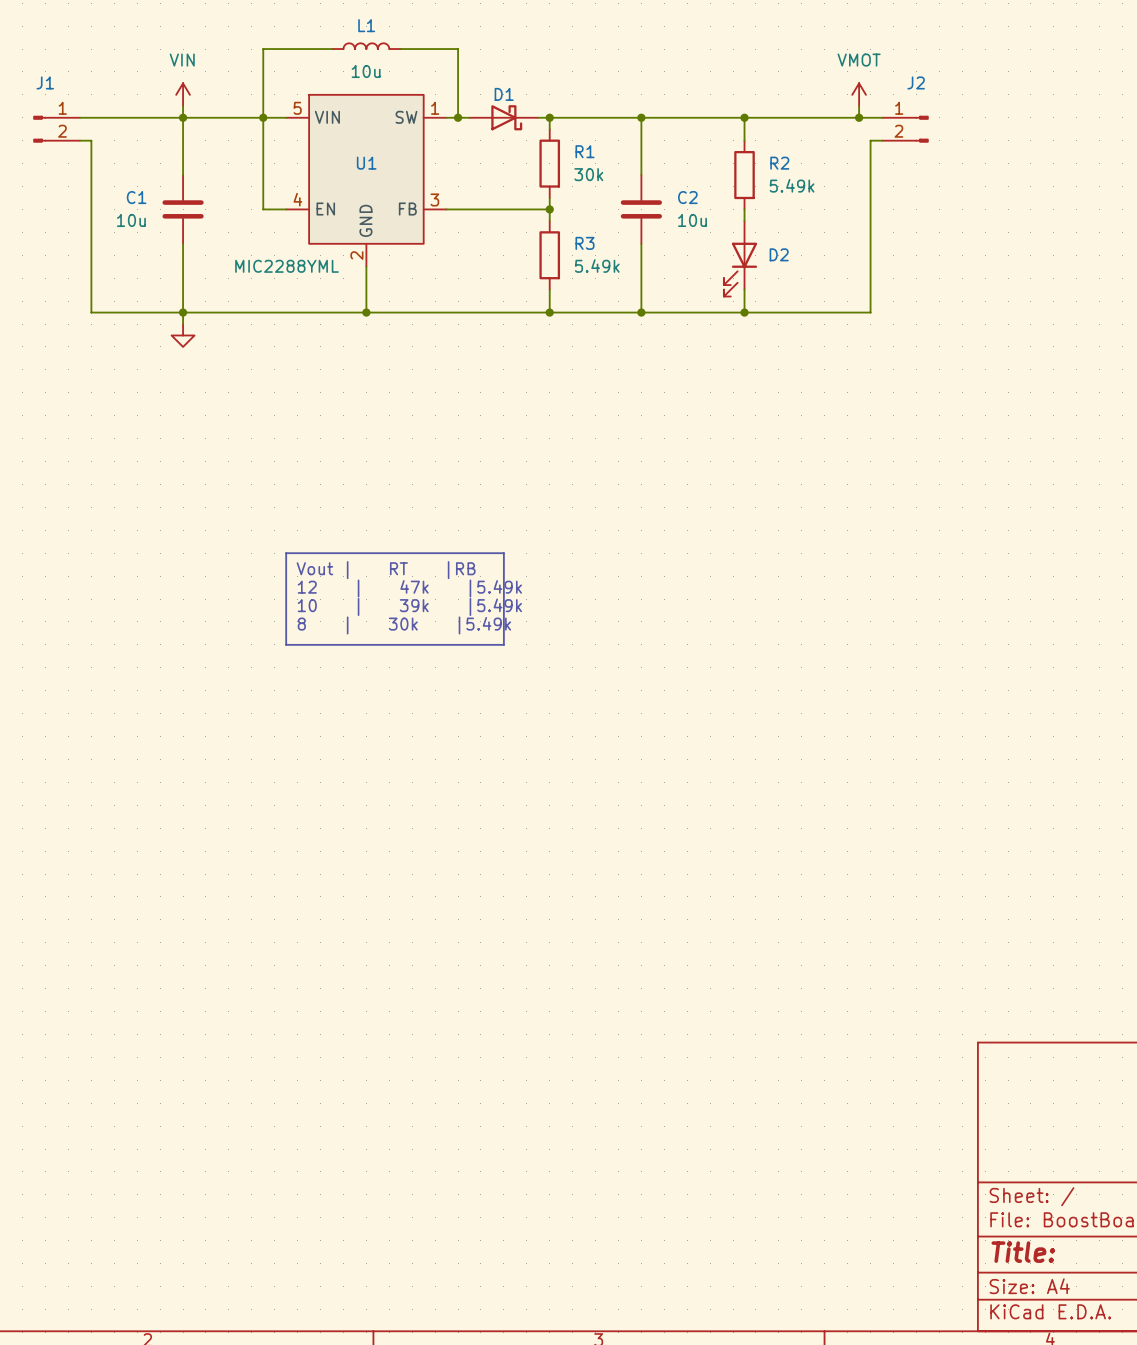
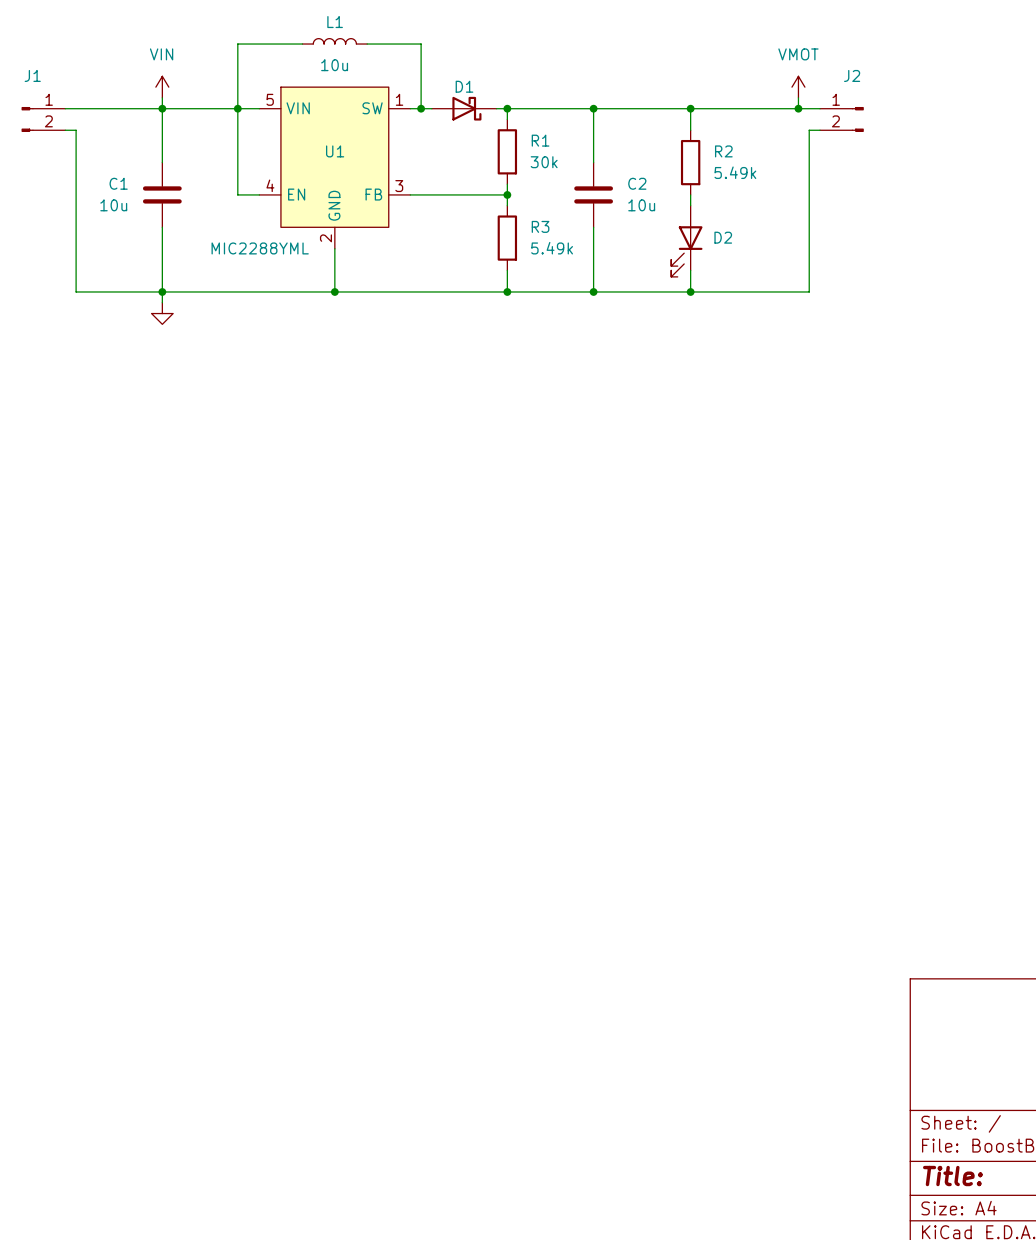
line: (286, 553) (503, 553) (503, 644) (286, 644) (286, 553) -> none
text: Vout | RT |RB (386, 570) -> none
text: 12 | 47k |5.49k (409, 588) -> none
text: 10 | 39k |5.49k (409, 607) -> none
text: 8 | 30k |5.49k (404, 625) -> none

